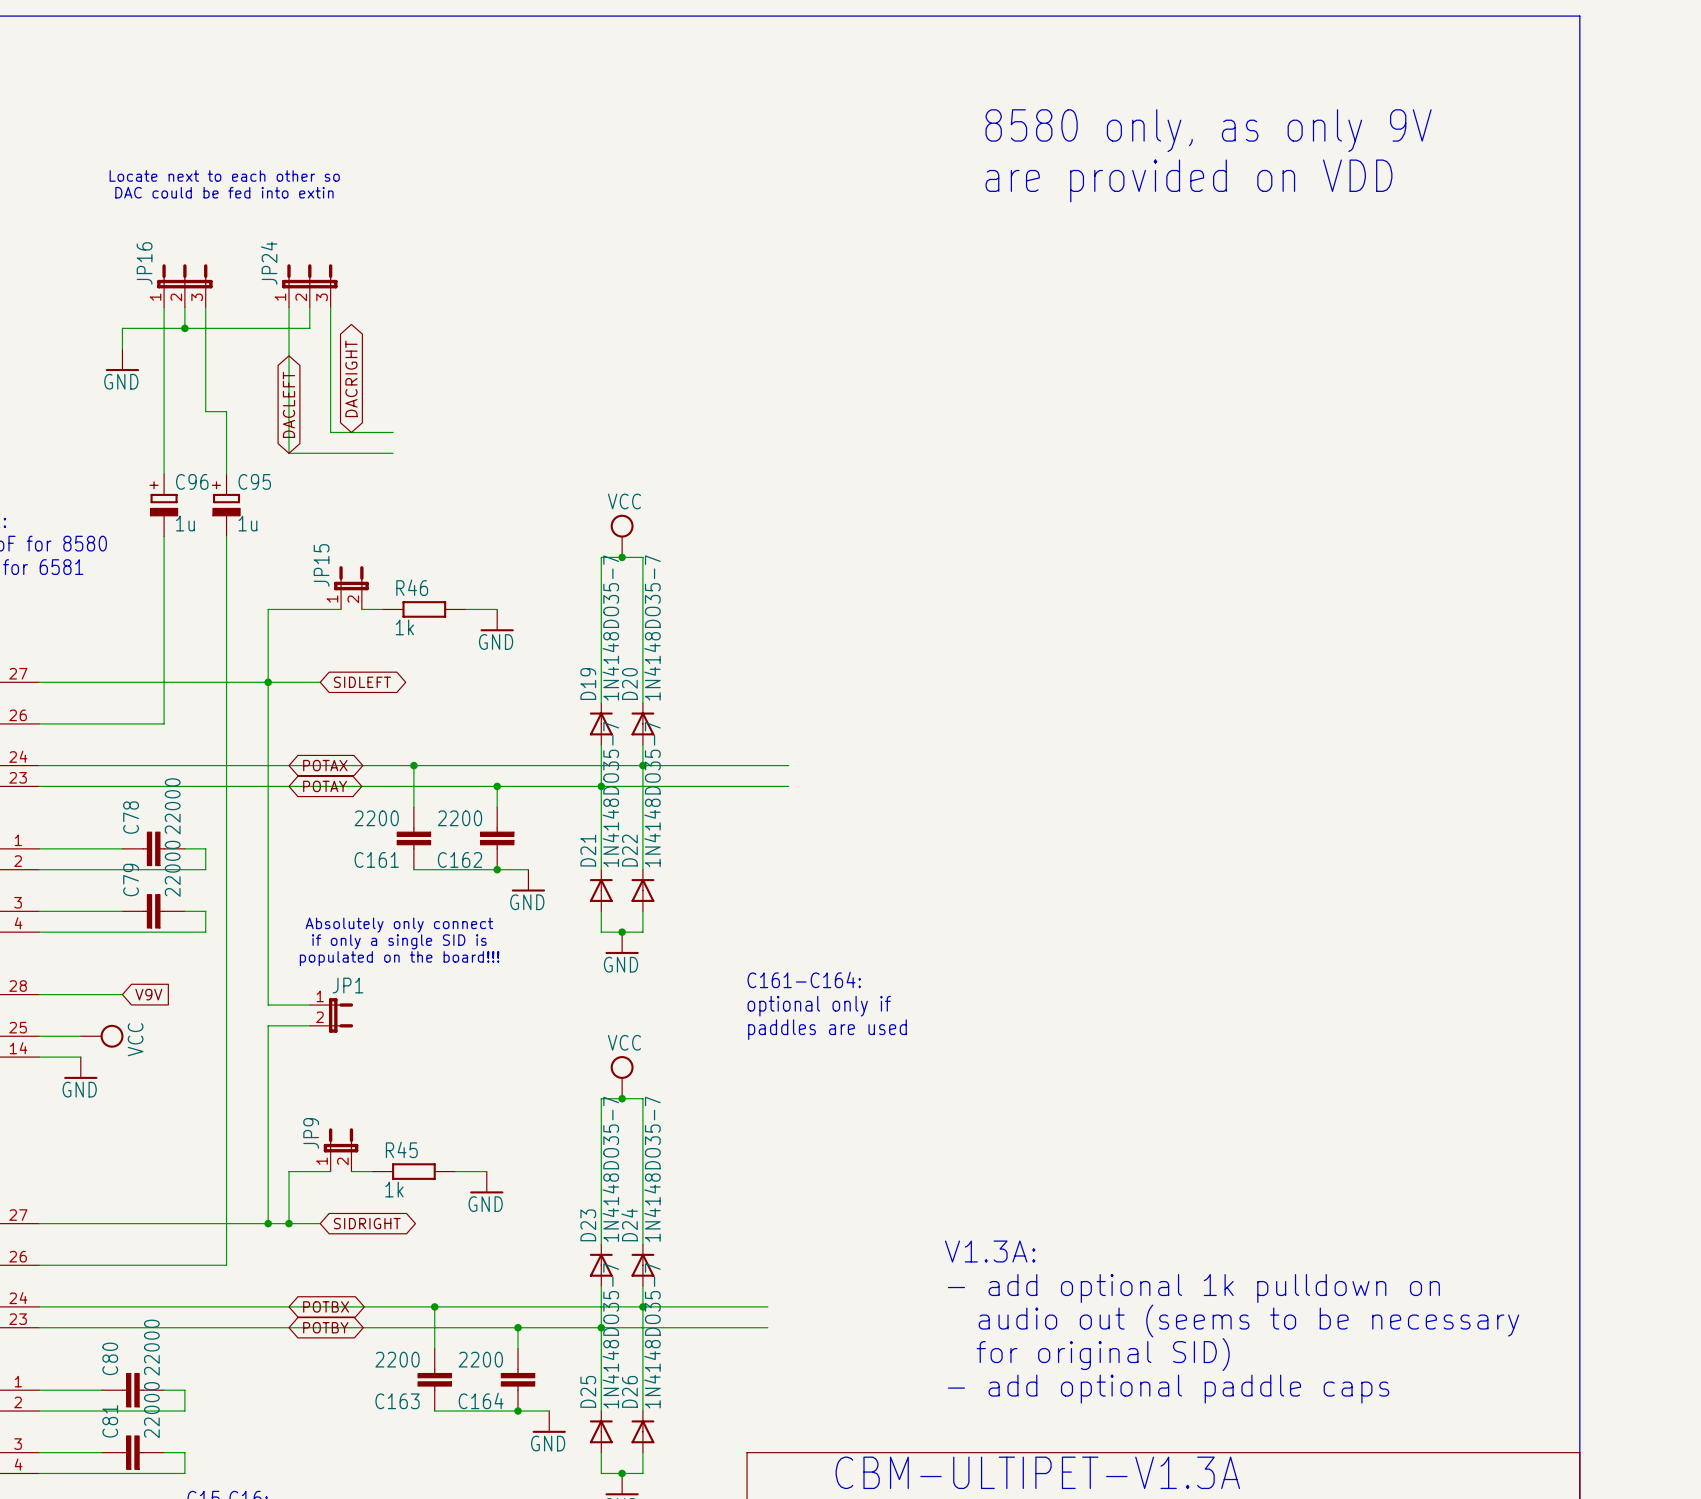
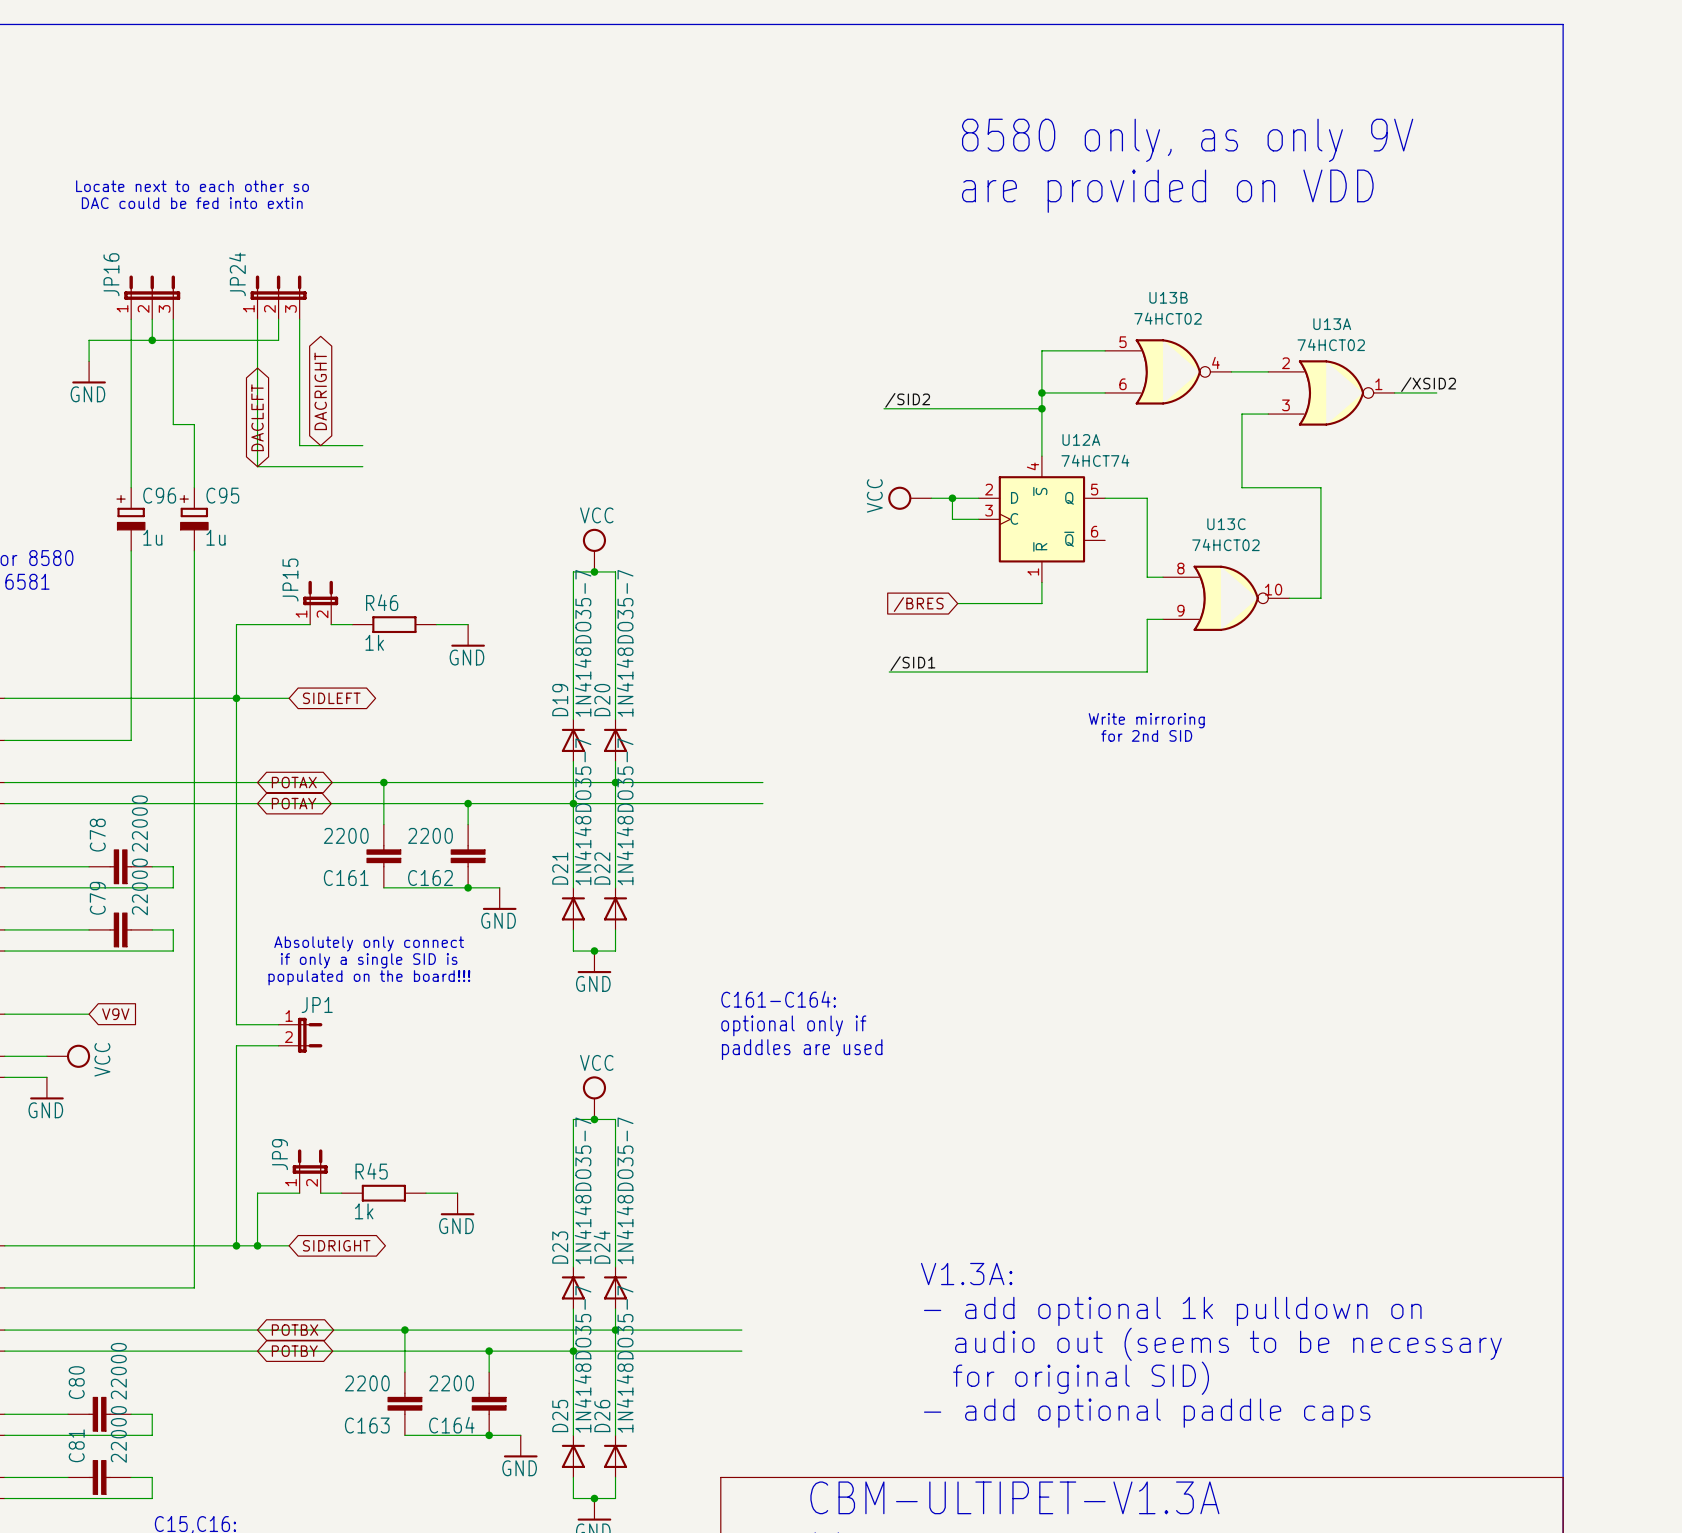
wire: none -> (1105, 350) (1041, 350) (1041, 456)
U13B: none -> 74HCT02 (1168, 371)
wire: none -> (1231, 371) (1268, 371)
label: none -> /XSID2 (1428, 384)
wire: none -> (1041, 392) (1105, 392)
junction: none -> (1041, 392)
U13A: none -> 74HCT02 (1331, 392)
wire: none -> (1394, 392) (1436, 392)
label: none -> /SID2 (907, 400)
wire: none -> (884, 408) (1041, 408)
junction: none -> (1041, 408)
wire: none -> (1268, 414) (1241, 414) (1241, 487) (1320, 487) (1320, 598) (1289, 598)
power symbol: none -> VCC (909, 498)
wire: none -> (931, 498) (978, 498)
wire: none -> (952, 498) (952, 519) (978, 519)
junction: none -> (952, 498)
wire: none -> (1105, 498) (1147, 498) (1147, 577) (1163, 577)
U12A: none -> 74HCT74 (1041, 519)
wire: none -> (1041, 582) (1041, 603) (957, 603)
U13C: none -> 74HCT02 (1226, 598)
global label: none -> /BRES (918, 604)
wire: none -> (1163, 619) (1147, 619) (1147, 671) (889, 671)
label: none -> /SID1 (912, 663)
text: none -> Write mirroring (1146, 720)
text: none -> for 2nd SID (1146, 735)

